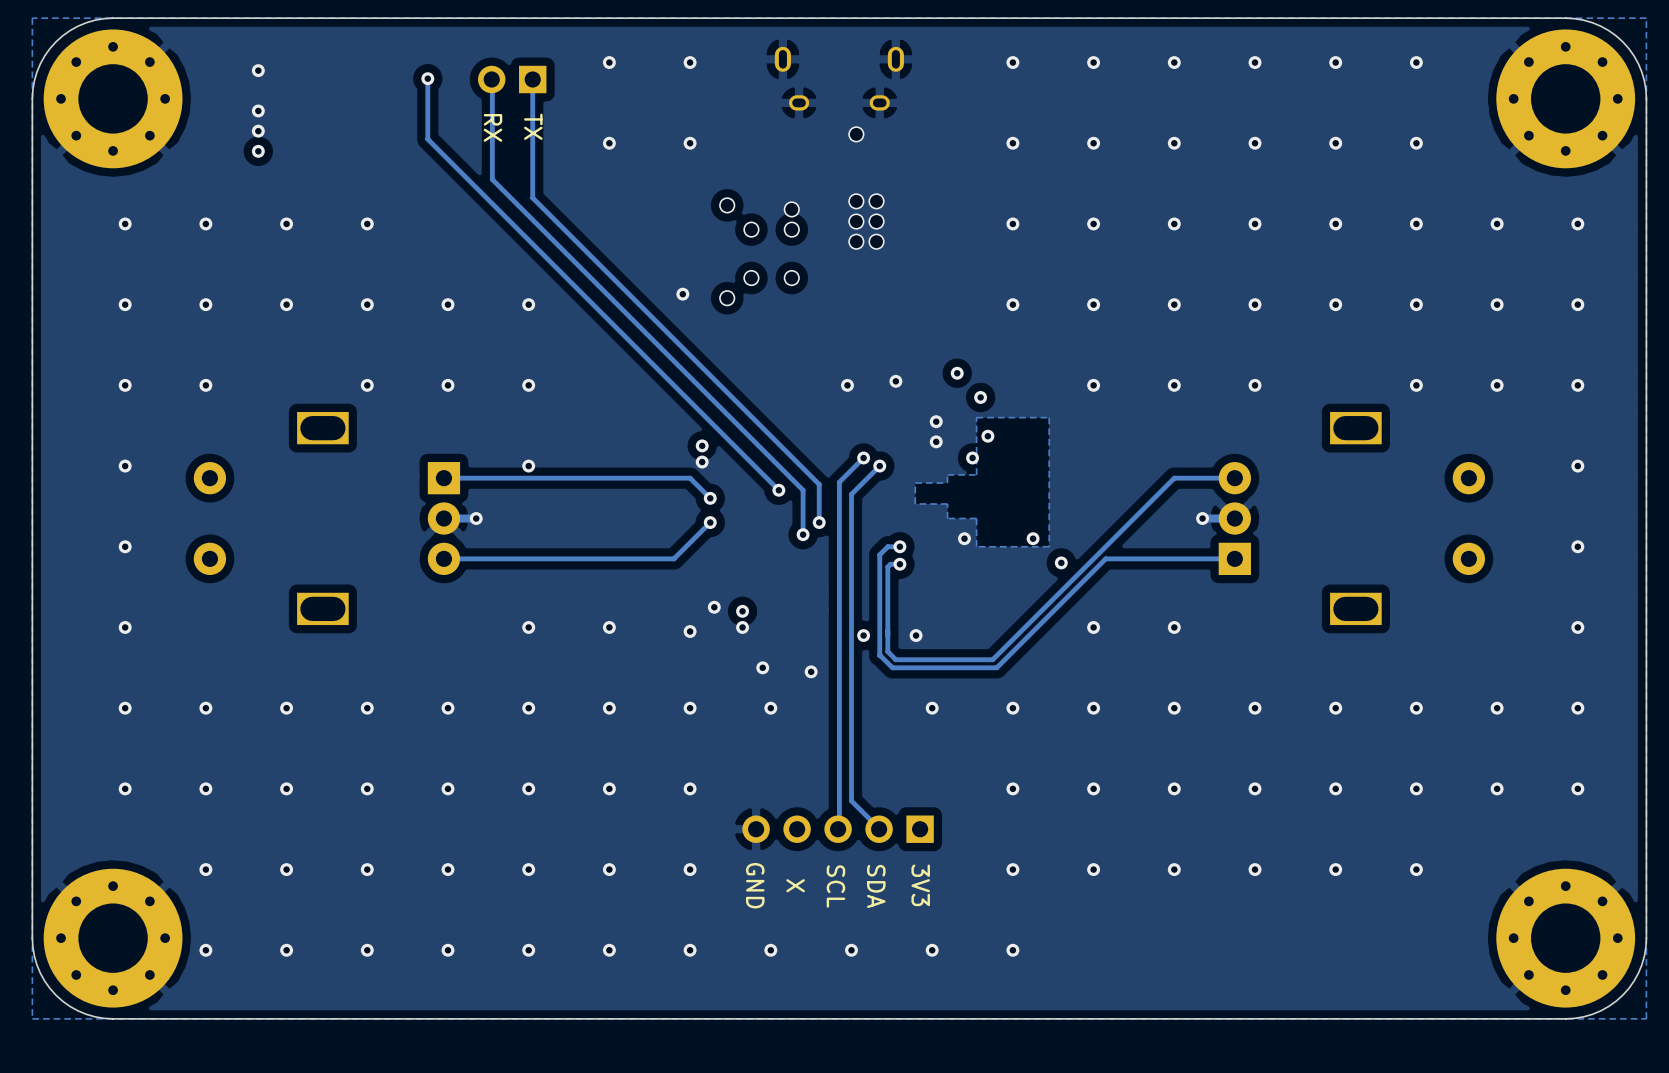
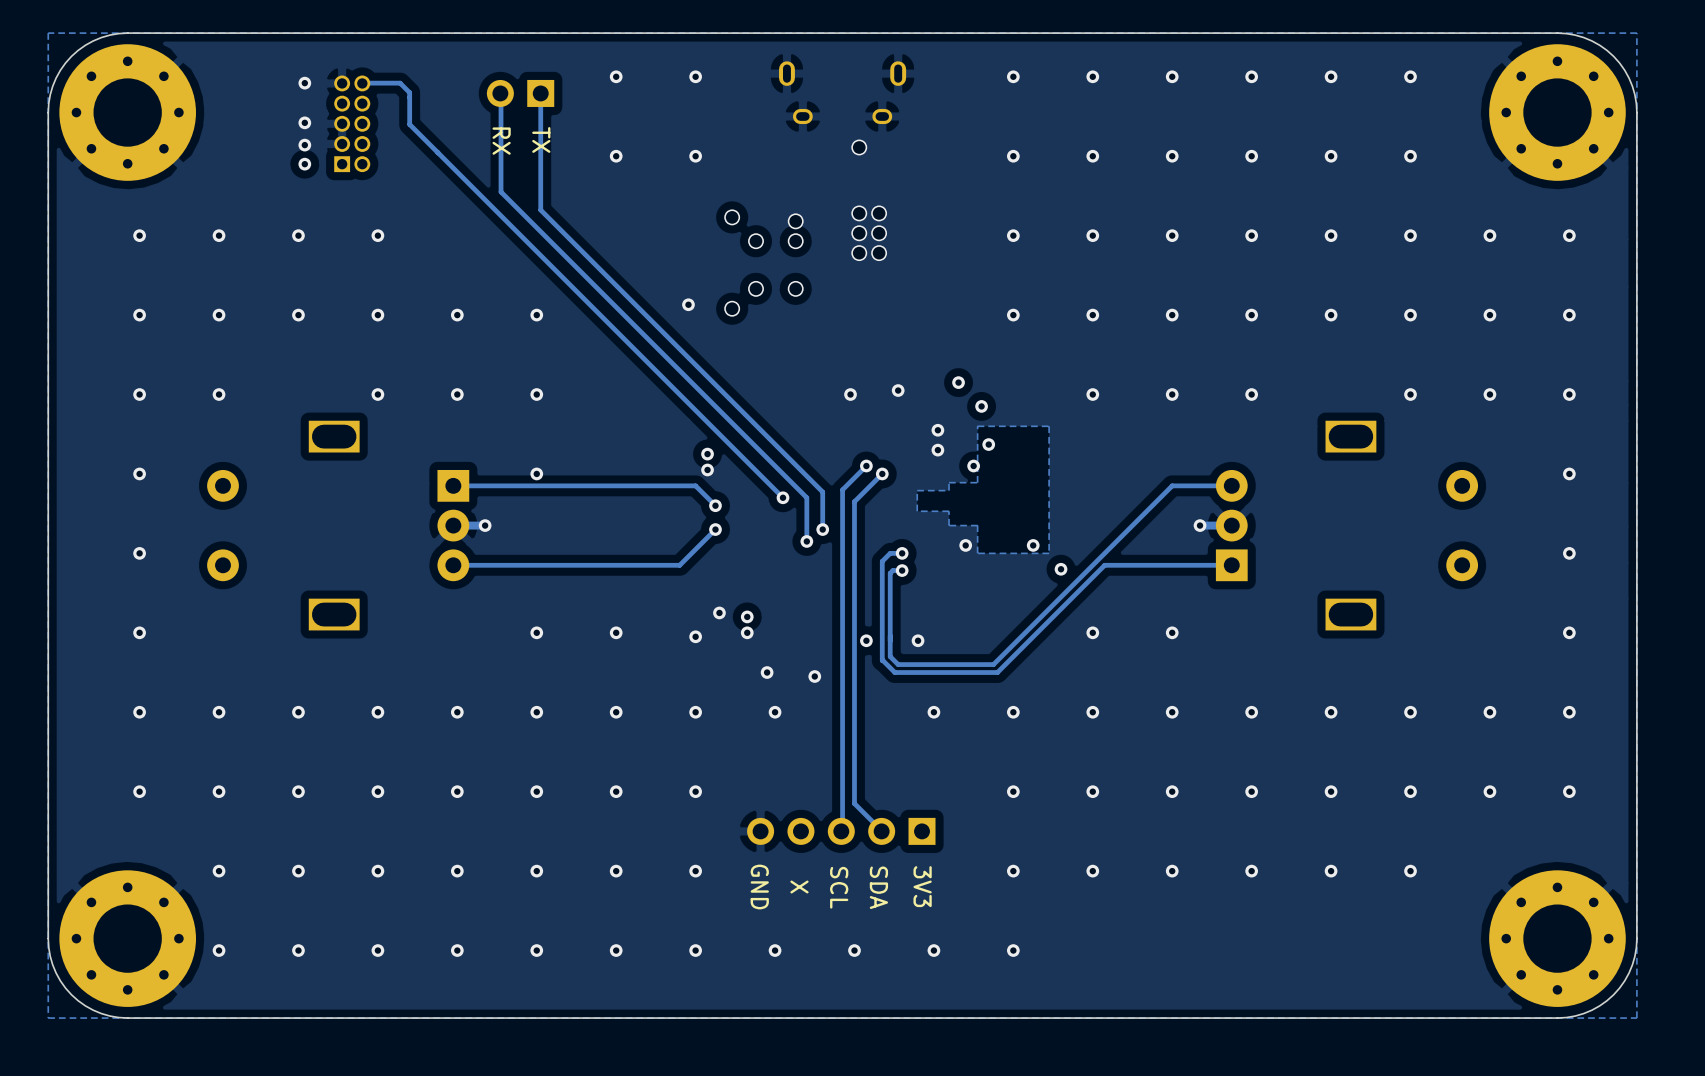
via: none -> (304, 83)
via: (258, 70) -> none
track: (427, 78) (427, 139) -> (362, 83) (400, 83) (409, 92) (409, 124) (437, 152)
via: (427, 78) -> none
via: none -> (304, 122)
via: (258, 110) -> none
part: none -> (352, 123)
via: (258, 131) -> none
via: none -> (304, 145)
via: (258, 151) -> none
via: none -> (304, 164)

